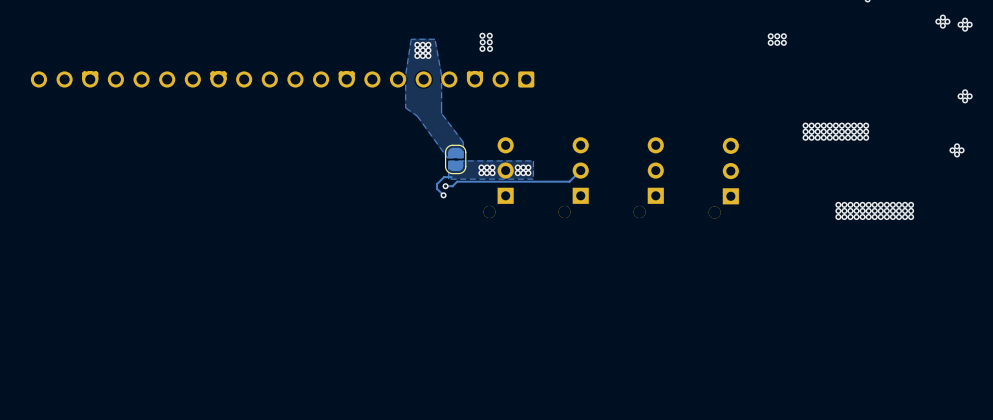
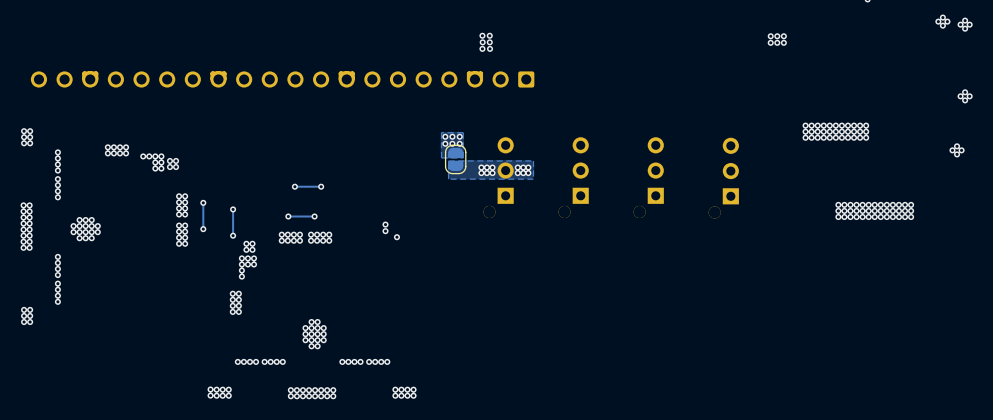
via: (417, 44) -> none
via: (422, 44) -> none
via: (428, 44) -> none
via: (417, 50) -> none
via: (422, 50) -> none
via: (428, 50) -> none
via: (417, 55) -> none
via: (422, 55) -> none
via: (428, 55) -> none
via: none -> (24, 131)
via: none -> (30, 131)
via: none -> (445, 136)
via: none -> (452, 136)
via: none -> (459, 136)
via: none -> (24, 137)
via: none -> (30, 137)
zone outline: (463, 142) (441, 113) (441, 75) (434, 39) (411, 39) (405, 75) (405, 107) (417, 116) (447, 157) -> (463, 142) (463, 132) (441, 132) (441, 157) (447, 157)
via: none -> (24, 143)
via: none -> (30, 143)
via: none -> (445, 143)
via: none -> (452, 143)
via: none -> (459, 143)
via: none -> (107, 147)
via: none -> (113, 147)
via: none -> (120, 147)
via: none -> (126, 147)
via: none -> (57, 152)
via: none -> (107, 153)
via: none -> (113, 153)
via: none -> (120, 153)
via: none -> (126, 153)
via: none -> (143, 156)
via: none -> (149, 156)
via: none -> (155, 156)
via: none -> (161, 156)
via: none -> (57, 158)
via: none -> (169, 160)
via: none -> (176, 160)
via: none -> (155, 162)
via: none -> (161, 162)
via: none -> (57, 164)
via: none -> (169, 167)
via: none -> (176, 167)
via: none -> (155, 168)
via: none -> (161, 168)
via: none -> (57, 170)
track: (580, 170) (569, 181) (457, 181) (452, 186) (445, 186) -> none
track: (451, 177) (444, 177) (437, 184) (437, 188) (443, 195) -> none
via: none -> (57, 179)
via: none -> (57, 185)
via: none -> (294, 186)
track: none -> (321, 186) (294, 186)
via: none -> (321, 186)
via: (445, 186) -> none
via: none -> (57, 191)
via: (443, 195) -> none
via: none -> (179, 196)
via: none -> (185, 196)
via: none -> (57, 197)
via: none -> (179, 202)
via: none -> (185, 202)
track: none -> (203, 202) (203, 229)
via: none -> (203, 202)
via: none -> (23, 205)
via: none -> (29, 205)
via: none -> (179, 208)
via: none -> (185, 208)
track: none -> (233, 209) (233, 235)
via: none -> (233, 209)
via: none -> (23, 211)
via: none -> (29, 211)
via: none -> (179, 214)
via: none -> (185, 214)
via: none -> (288, 216)
track: none -> (314, 216) (288, 216)
via: none -> (314, 216)
via: none -> (23, 217)
via: none -> (29, 217)
via: none -> (79, 220)
via: none -> (85, 220)
via: none -> (91, 220)
via: none -> (23, 223)
via: none -> (29, 223)
via: none -> (385, 224)
via: none -> (179, 225)
via: none -> (185, 225)
via: none -> (73, 226)
via: none -> (79, 226)
via: none -> (85, 226)
via: none -> (91, 226)
via: none -> (97, 226)
via: none -> (23, 229)
via: none -> (29, 229)
via: none -> (203, 229)
via: none -> (179, 231)
via: none -> (185, 231)
via: none -> (385, 231)
via: none -> (73, 232)
via: none -> (79, 232)
via: none -> (85, 232)
via: none -> (91, 232)
via: none -> (97, 232)
via: none -> (281, 234)
via: none -> (287, 234)
via: none -> (293, 234)
via: none -> (299, 234)
via: none -> (311, 234)
via: none -> (317, 234)
via: none -> (323, 234)
via: none -> (329, 234)
via: none -> (23, 235)
via: none -> (29, 235)
via: none -> (233, 235)
via: none -> (179, 237)
via: none -> (185, 237)
via: none -> (396, 237)
via: none -> (79, 238)
via: none -> (85, 238)
via: none -> (91, 238)
via: none -> (281, 240)
via: none -> (287, 240)
via: none -> (293, 240)
via: none -> (299, 240)
via: none -> (311, 240)
via: none -> (317, 240)
via: none -> (323, 240)
via: none -> (329, 240)
via: none -> (23, 241)
via: none -> (29, 241)
via: none -> (179, 243)
via: none -> (185, 243)
via: none -> (246, 243)
via: none -> (252, 243)
via: none -> (23, 247)
via: none -> (29, 247)
via: none -> (246, 249)
via: none -> (252, 249)
via: none -> (57, 256)
via: none -> (241, 258)
via: none -> (247, 258)
via: none -> (254, 258)
via: none -> (57, 262)
via: none -> (241, 264)
via: none -> (247, 264)
via: none -> (254, 264)
via: none -> (57, 269)
via: none -> (241, 270)
via: none -> (57, 275)
via: none -> (241, 276)
via: none -> (57, 283)
via: none -> (57, 289)
via: none -> (232, 293)
via: none -> (238, 293)
via: none -> (57, 295)
via: none -> (232, 299)
via: none -> (238, 299)
via: none -> (57, 301)
via: none -> (232, 305)
via: none -> (238, 305)
via: none -> (24, 309)
via: none -> (30, 309)
via: none -> (232, 311)
via: none -> (238, 311)
via: none -> (24, 315)
via: none -> (30, 315)
via: none -> (24, 322)
via: none -> (30, 322)
via: none -> (311, 322)
via: none -> (317, 322)
via: none -> (305, 328)
via: none -> (311, 328)
via: none -> (317, 328)
via: none -> (323, 328)
via: none -> (305, 334)
via: none -> (311, 334)
via: none -> (317, 334)
via: none -> (323, 334)
via: none -> (305, 340)
via: none -> (311, 340)
via: none -> (317, 340)
via: none -> (323, 340)
via: none -> (311, 346)
via: none -> (317, 346)
via: none -> (237, 361)
via: none -> (243, 361)
via: none -> (249, 361)
via: none -> (256, 361)
via: none -> (264, 361)
via: none -> (270, 361)
via: none -> (276, 361)
via: none -> (282, 361)
via: none -> (342, 361)
via: none -> (348, 361)
via: none -> (354, 361)
via: none -> (360, 361)
via: none -> (369, 361)
via: none -> (375, 361)
via: none -> (381, 361)
via: none -> (387, 361)
via: none -> (210, 389)
via: none -> (216, 389)
via: none -> (222, 389)
via: none -> (228, 389)
via: none -> (395, 389)
via: none -> (401, 389)
via: none -> (407, 389)
via: none -> (413, 389)
via: none -> (290, 390)
via: none -> (296, 390)
via: none -> (302, 390)
via: none -> (309, 390)
via: none -> (315, 390)
via: none -> (321, 390)
via: none -> (327, 390)
via: none -> (333, 390)
via: none -> (210, 395)
via: none -> (216, 395)
via: none -> (222, 395)
via: none -> (228, 395)
via: none -> (395, 395)
via: none -> (401, 395)
via: none -> (407, 395)
via: none -> (413, 395)
via: none -> (290, 396)
via: none -> (296, 396)
via: none -> (302, 396)
via: none -> (309, 396)
via: none -> (315, 396)
via: none -> (321, 396)
via: none -> (327, 396)
via: none -> (333, 396)

